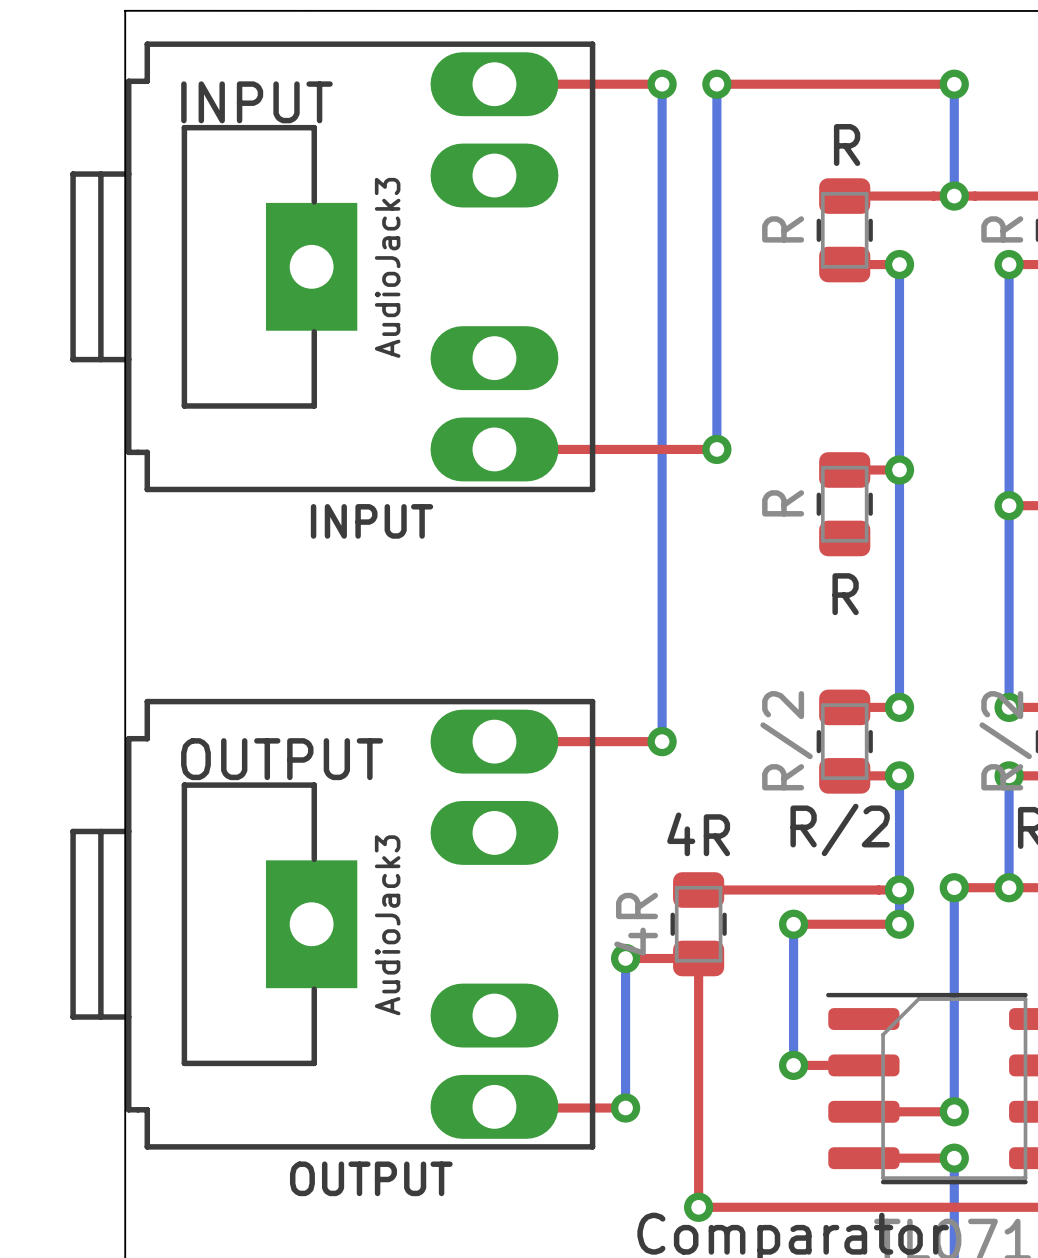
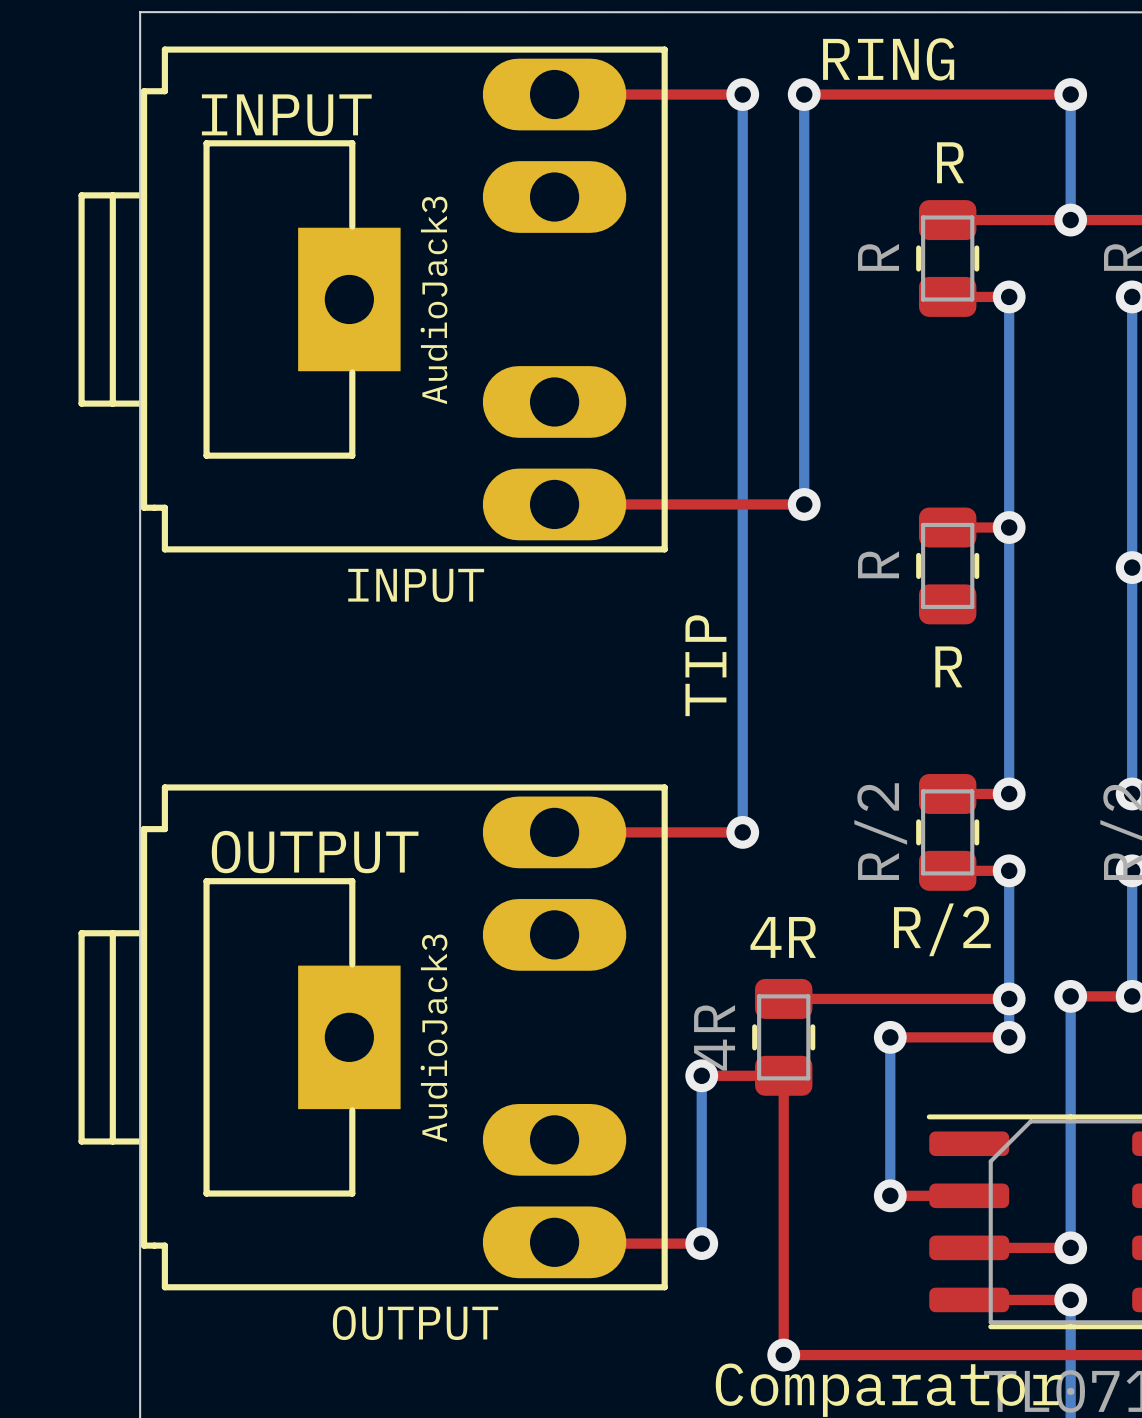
text: none -> RING (888, 59)
text: none -> TIP (705, 665)

